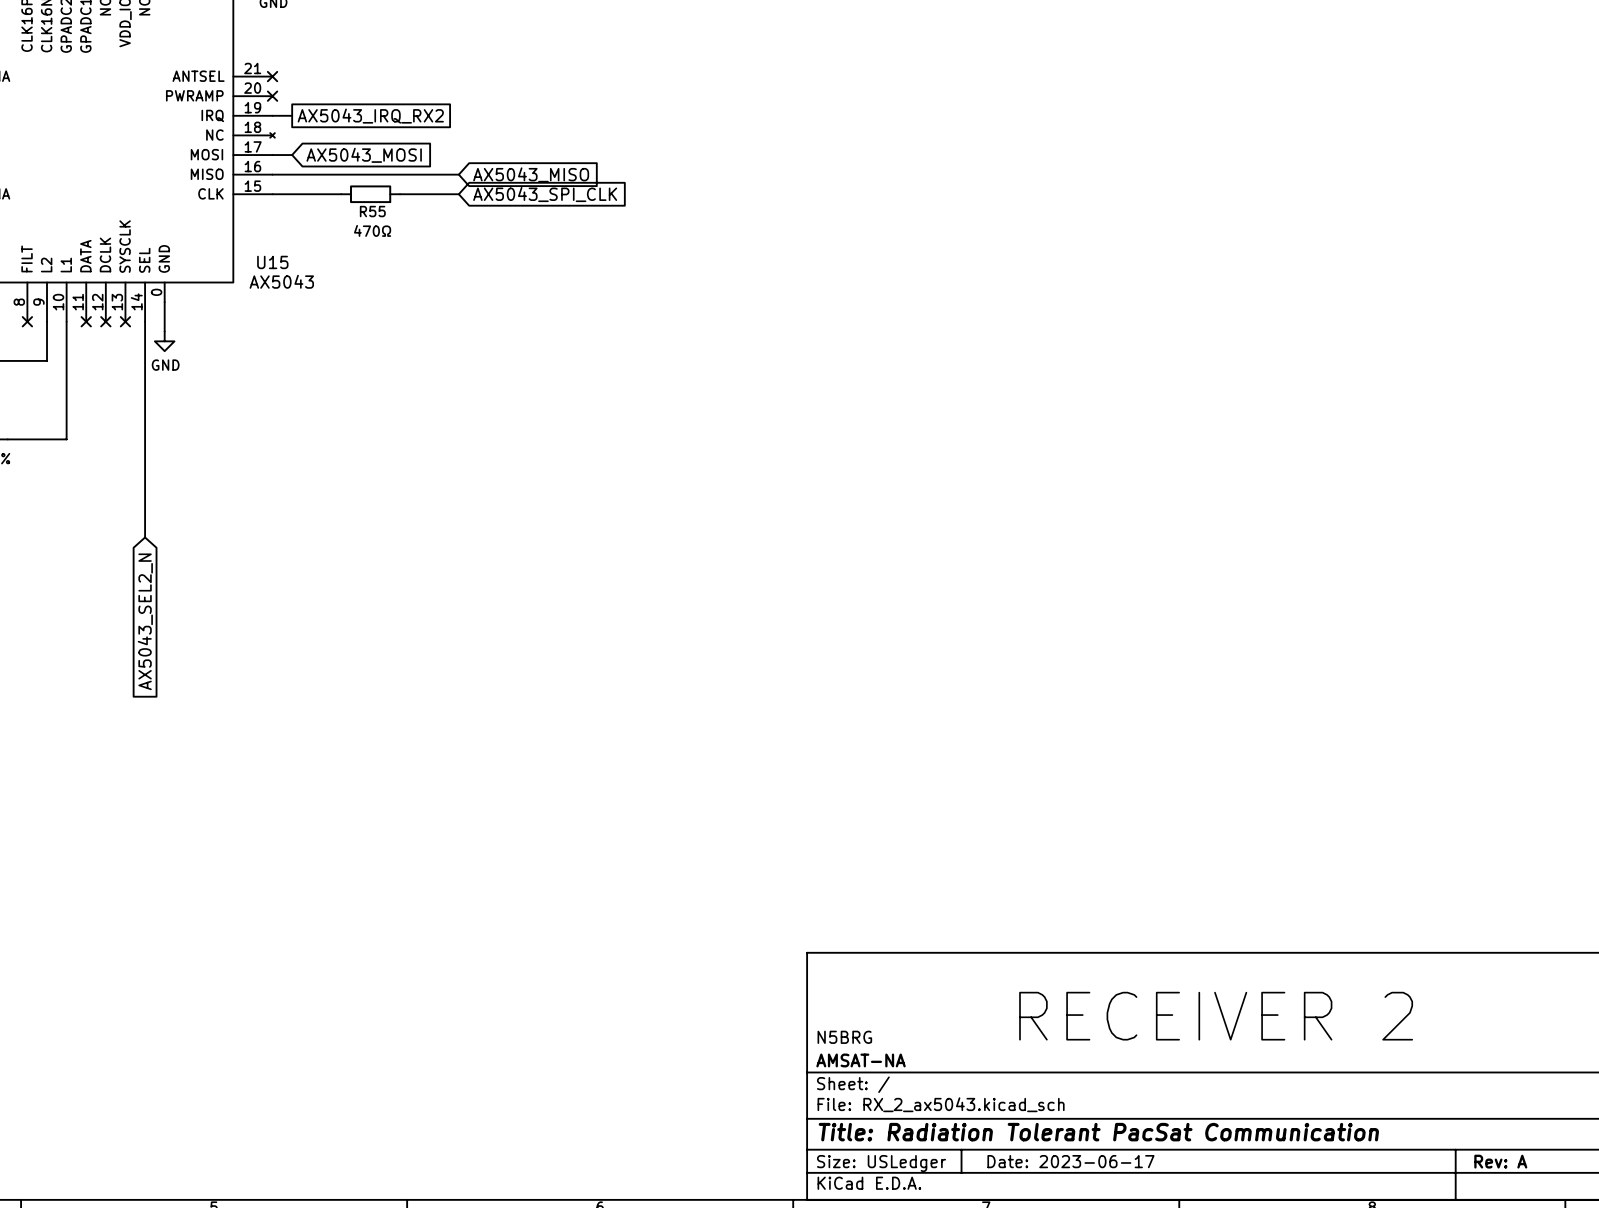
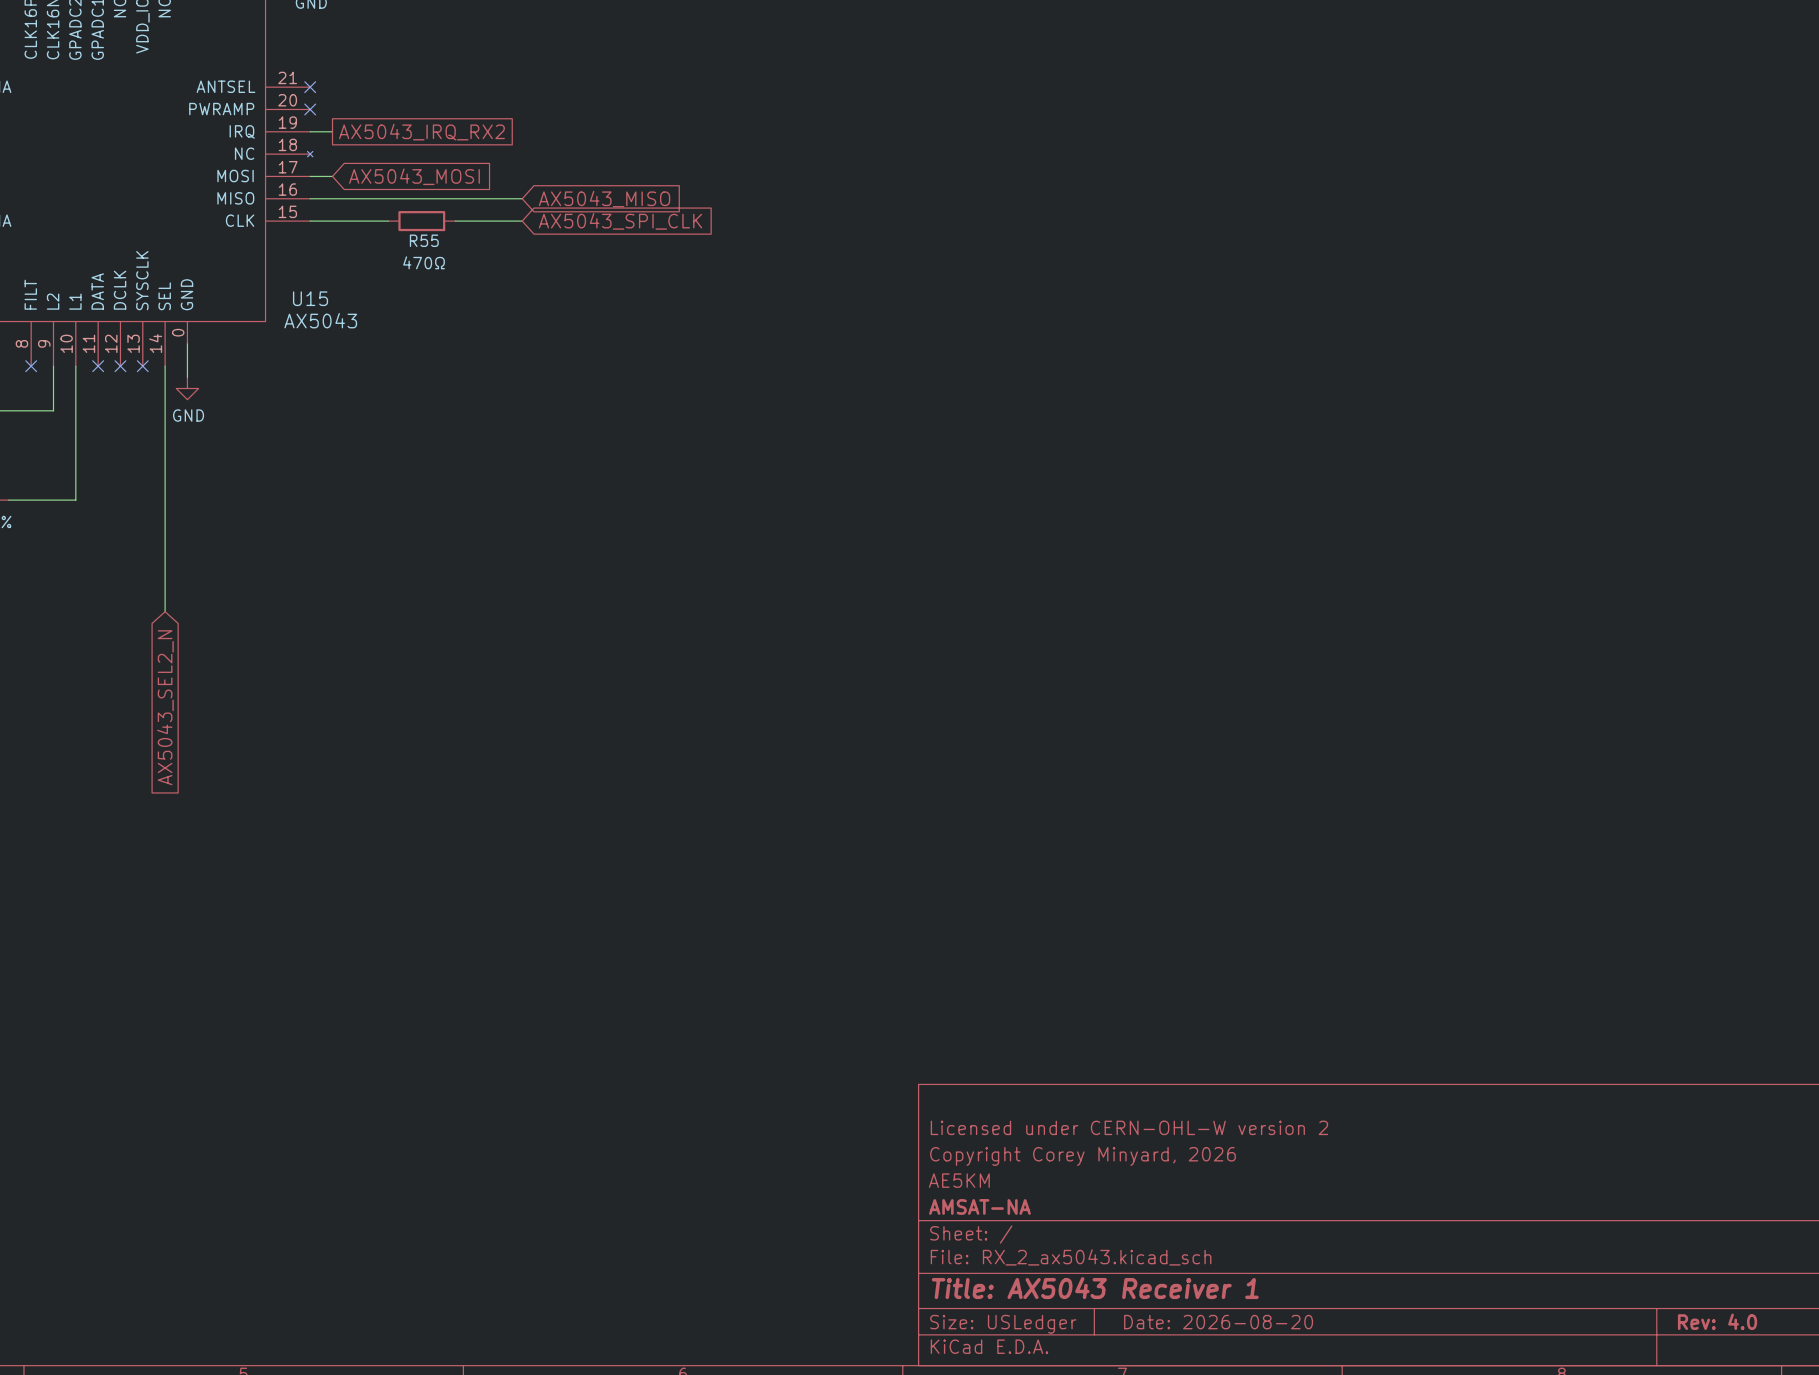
title block: none -> Licensed under CERN-OHL-W version 2 (1129, 1127)
title block: none -> Copyright Corey Minyard, 2026 (1083, 1156)
text: RECEIVER 2 (1216, 1016) -> none
title block: N5BRG (844, 1037) -> AE5KM (959, 1180)
title block: Title: Radiation Tolerant PacSat Communication (1098, 1132) -> Title: AX5043 Receiver 1 (1095, 1288)
title block: Date: 2023-06-17 (1070, 1161) -> Date: 2026-08-20 (1218, 1322)
title block: Rev: A (1500, 1161) -> Rev: 4.0 (1717, 1321)

